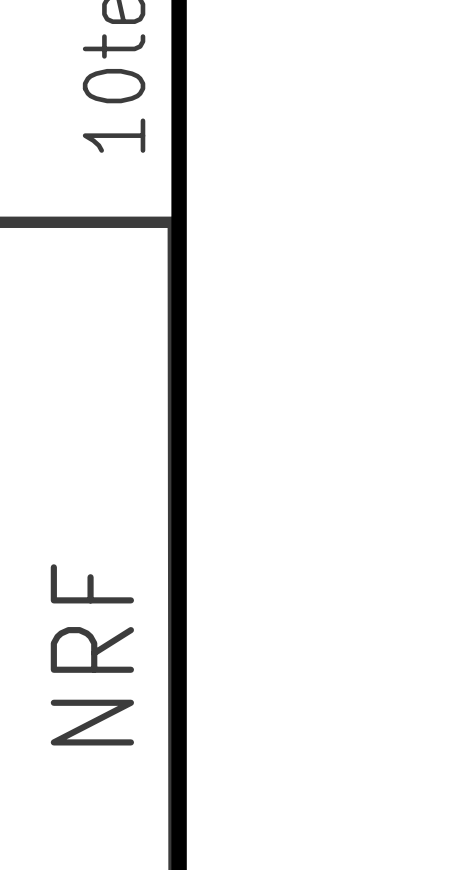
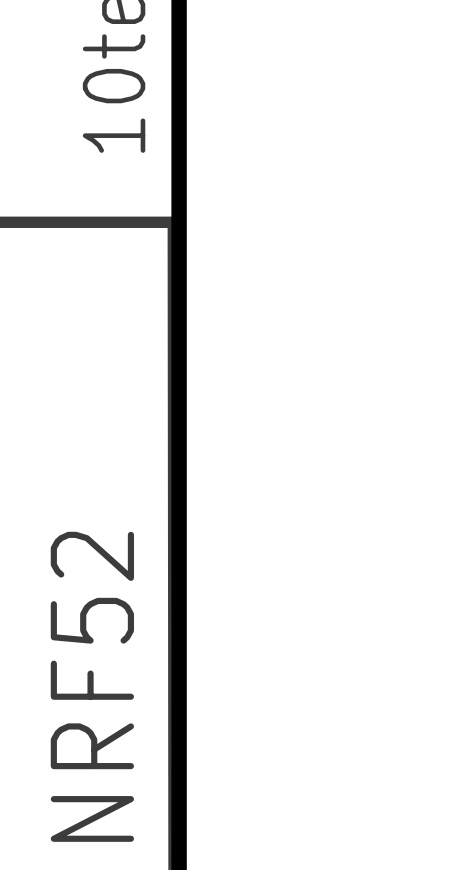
text: NRF (92, 654) -> NRF52 (92, 686)

